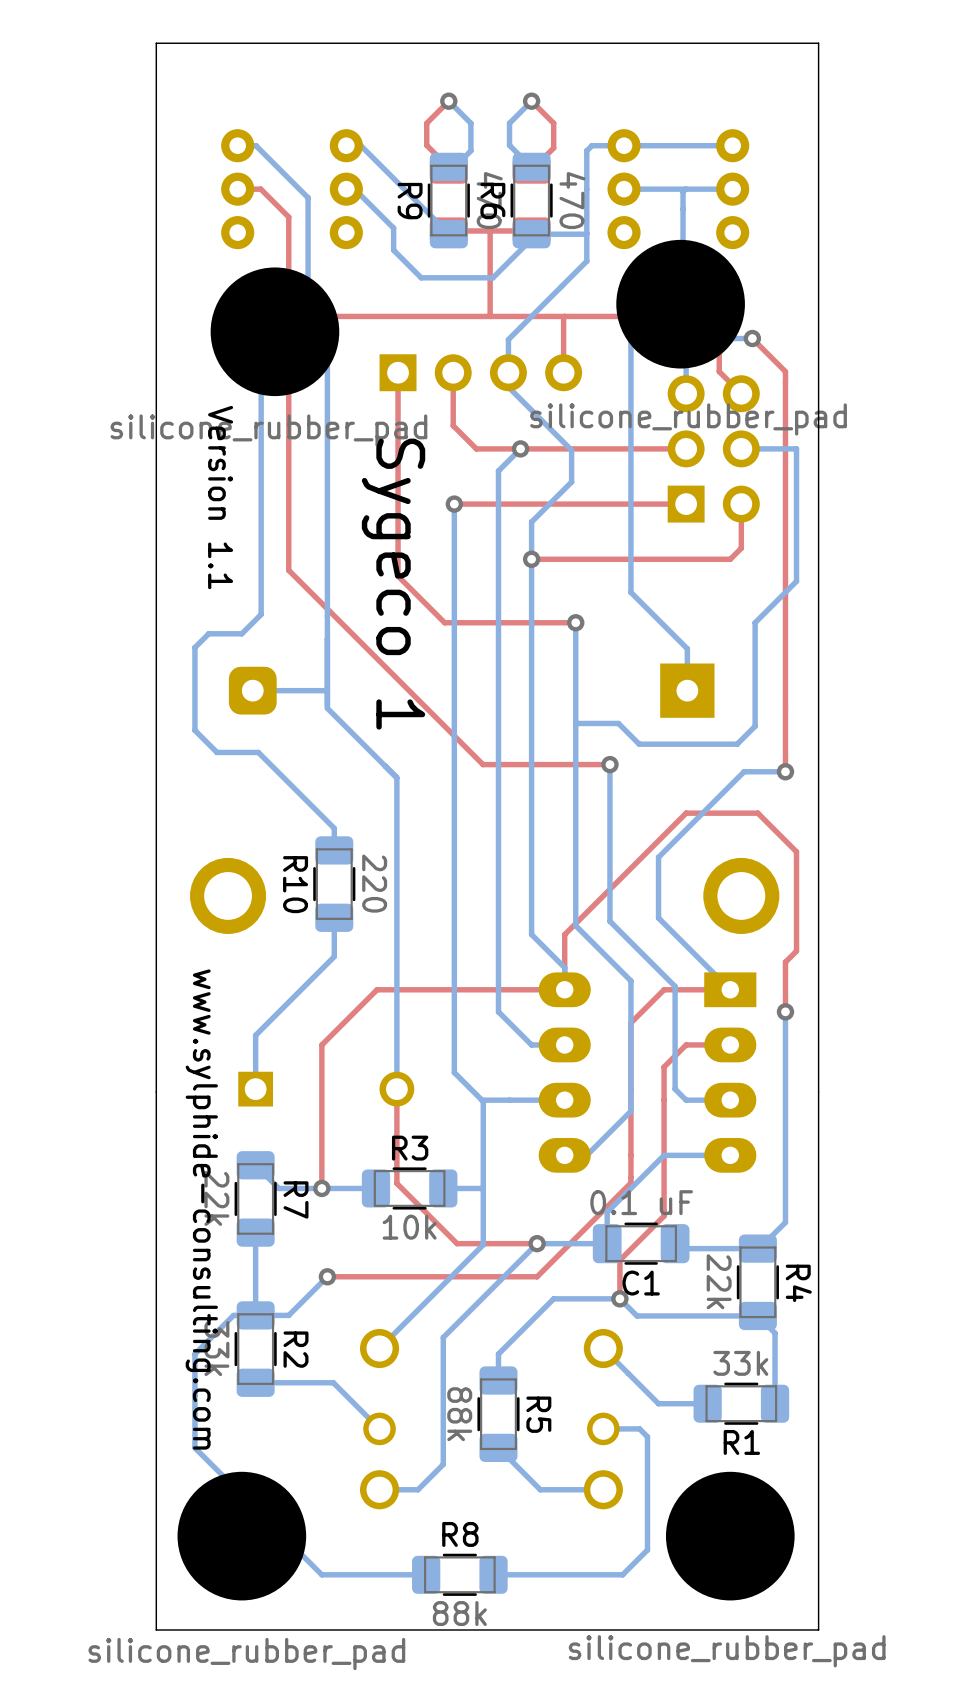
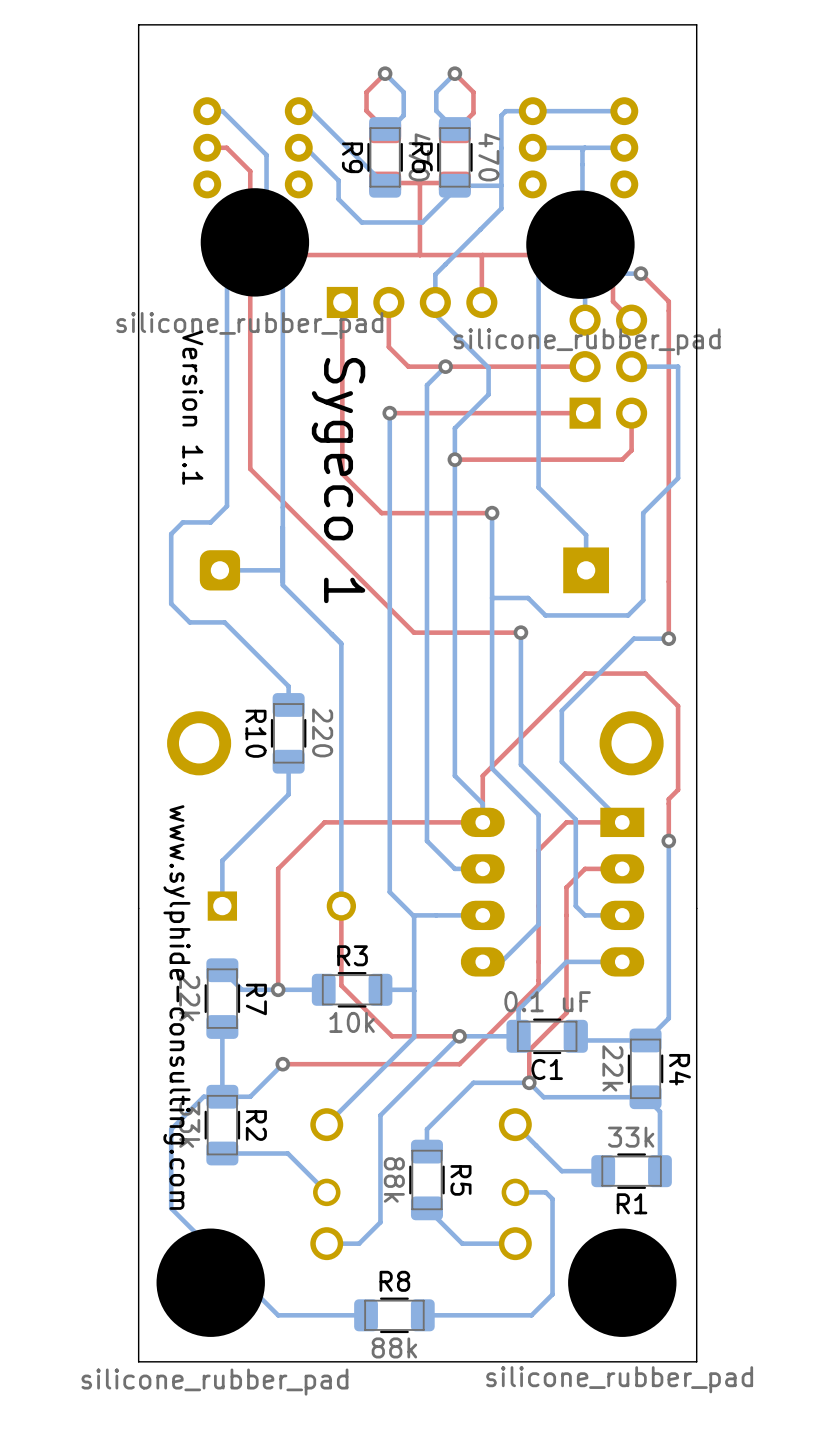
drawing position: (274, 331) -> (254, 242)

